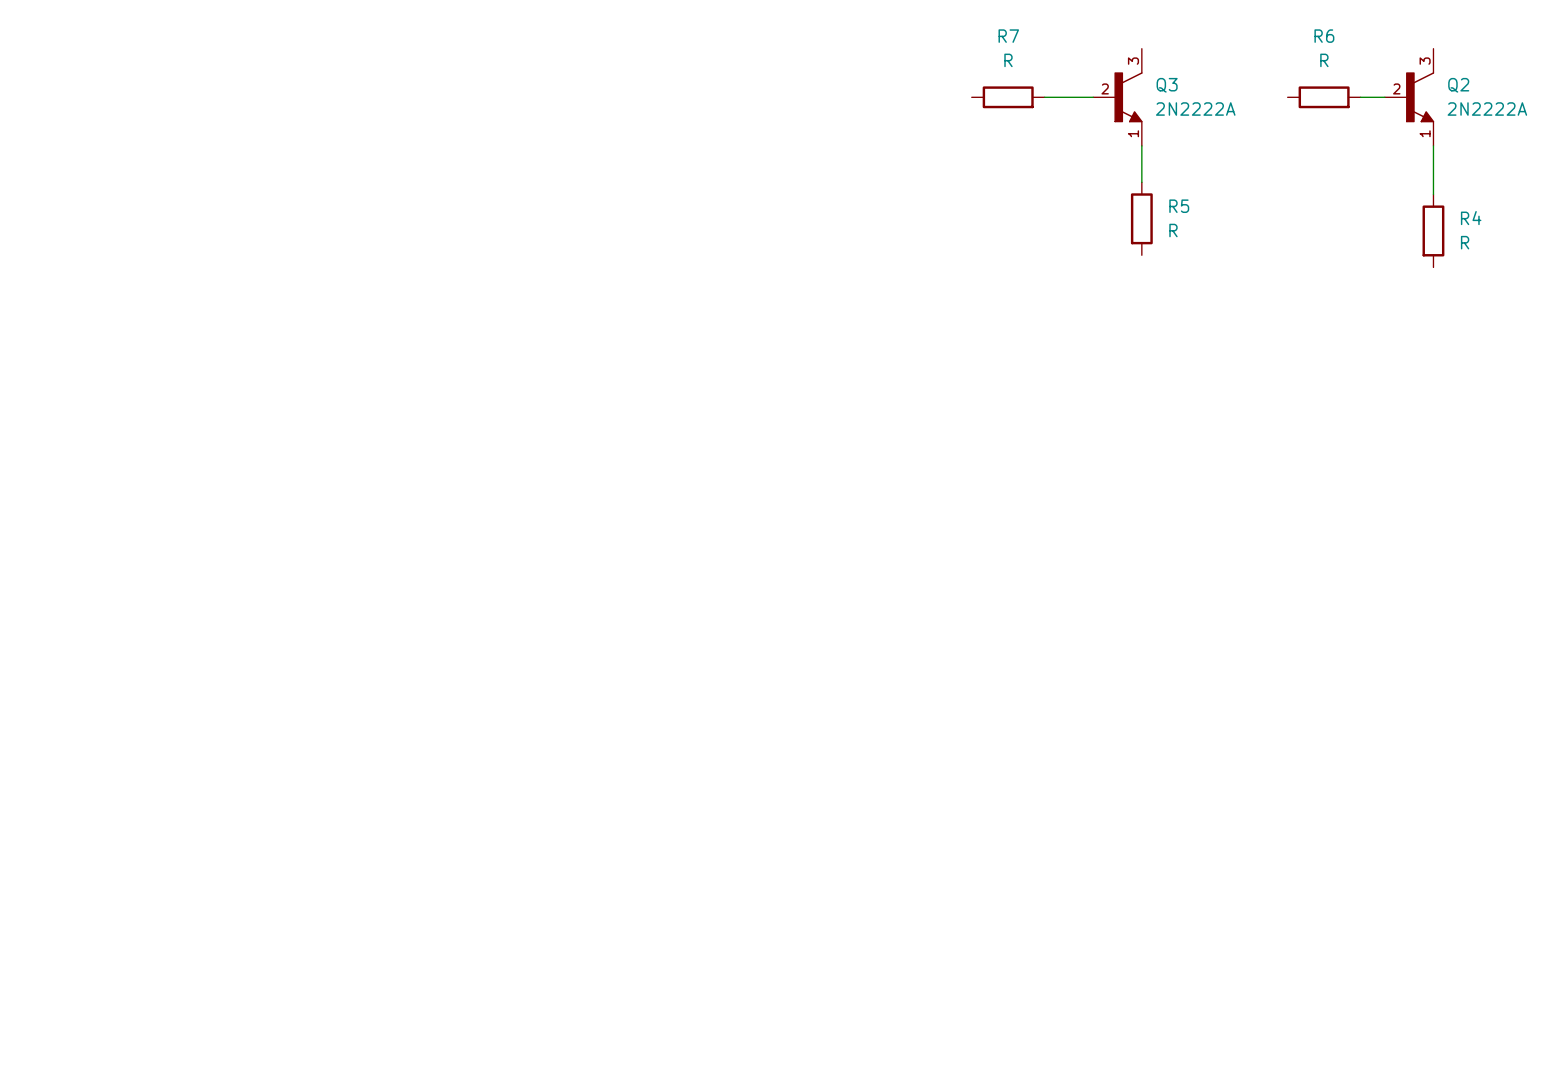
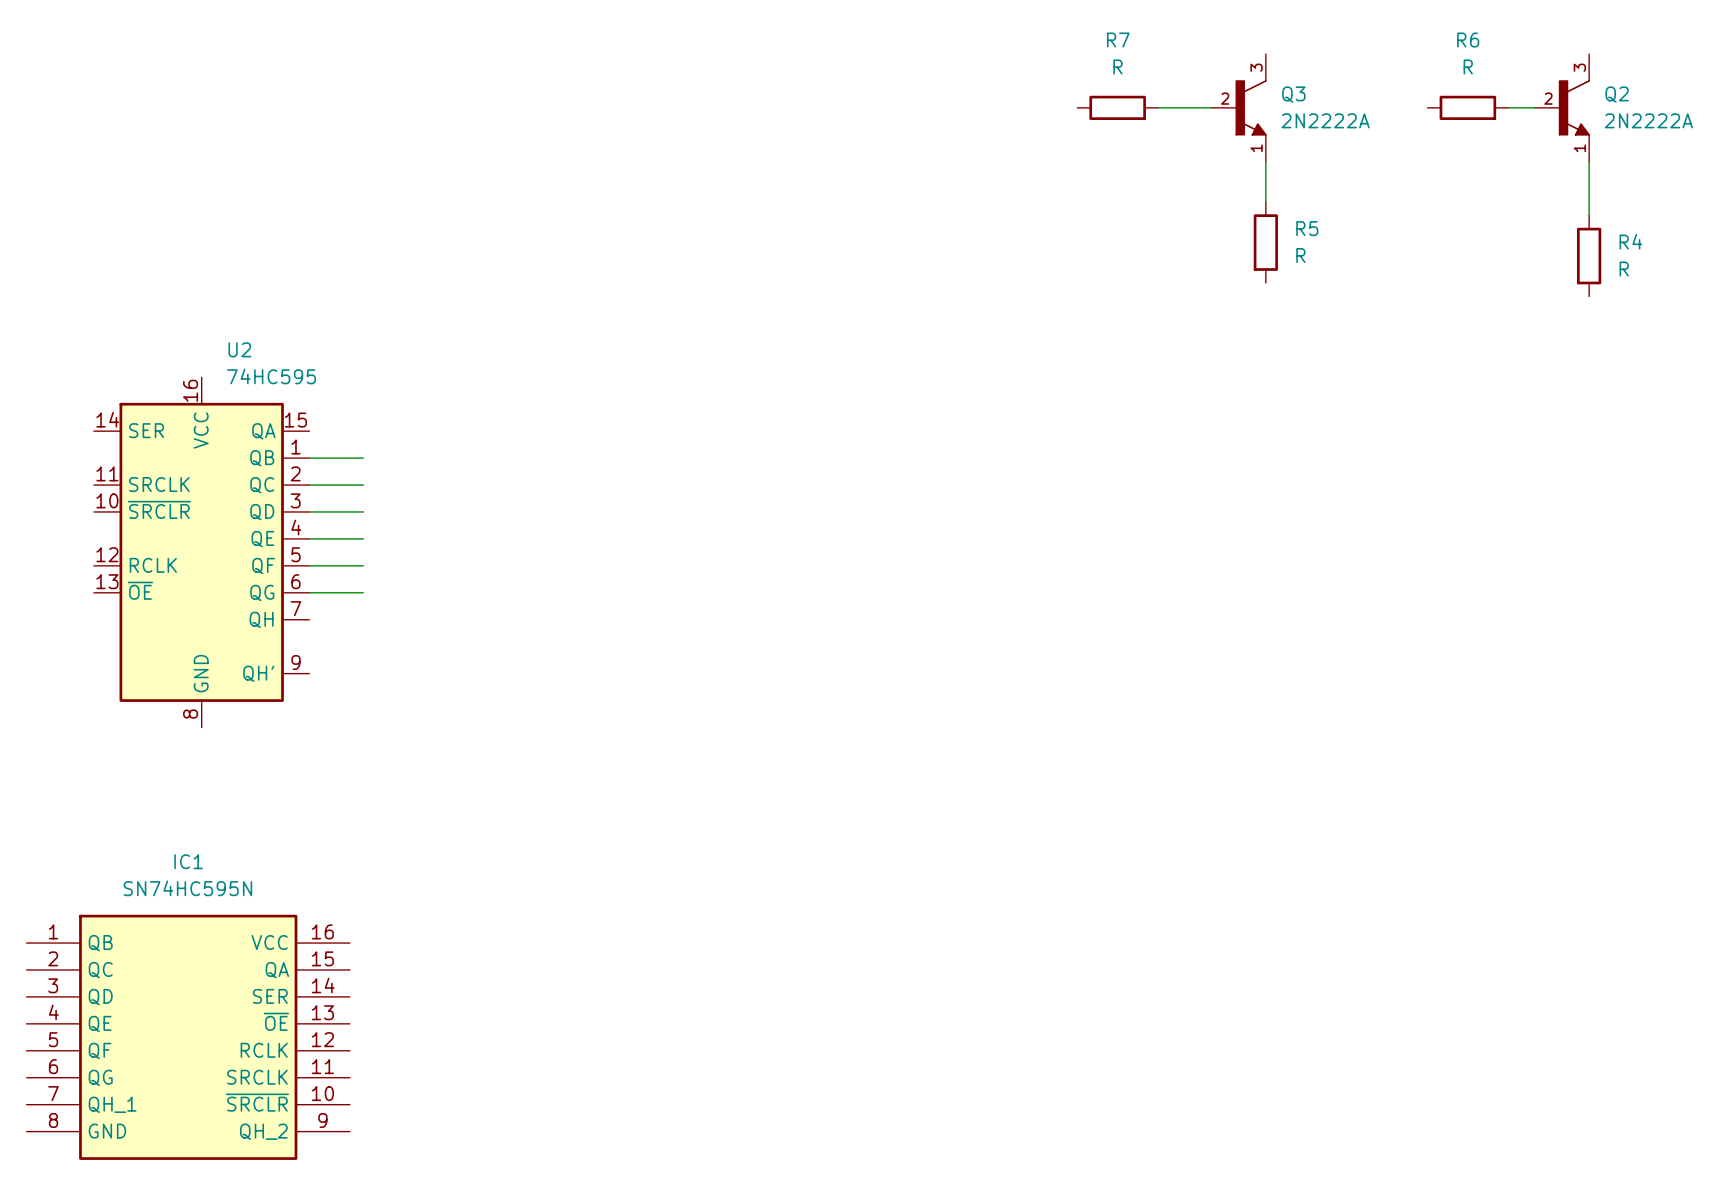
wire: none -> (309, 458) (363, 458)
wire: none -> (309, 485) (363, 485)
wire: none -> (309, 511) (363, 511)
wire: none -> (309, 538) (363, 538)
U2: none -> 74HC595 (201, 552)
wire: none -> (309, 565) (363, 565)
wire: none -> (309, 592) (363, 592)
IC1: none -> SN74HC595N (188, 1037)

